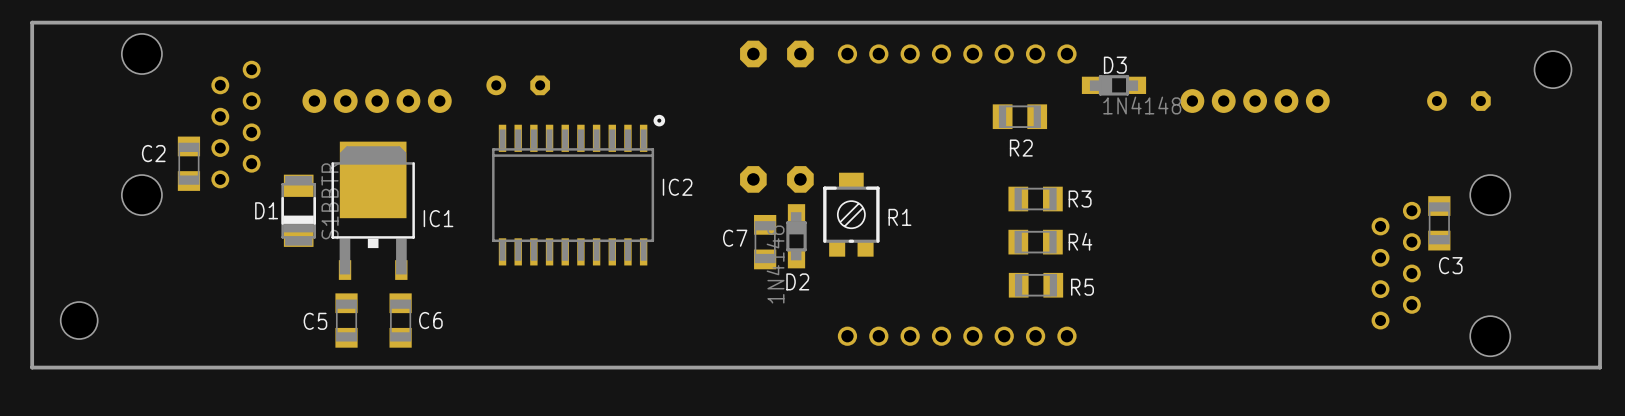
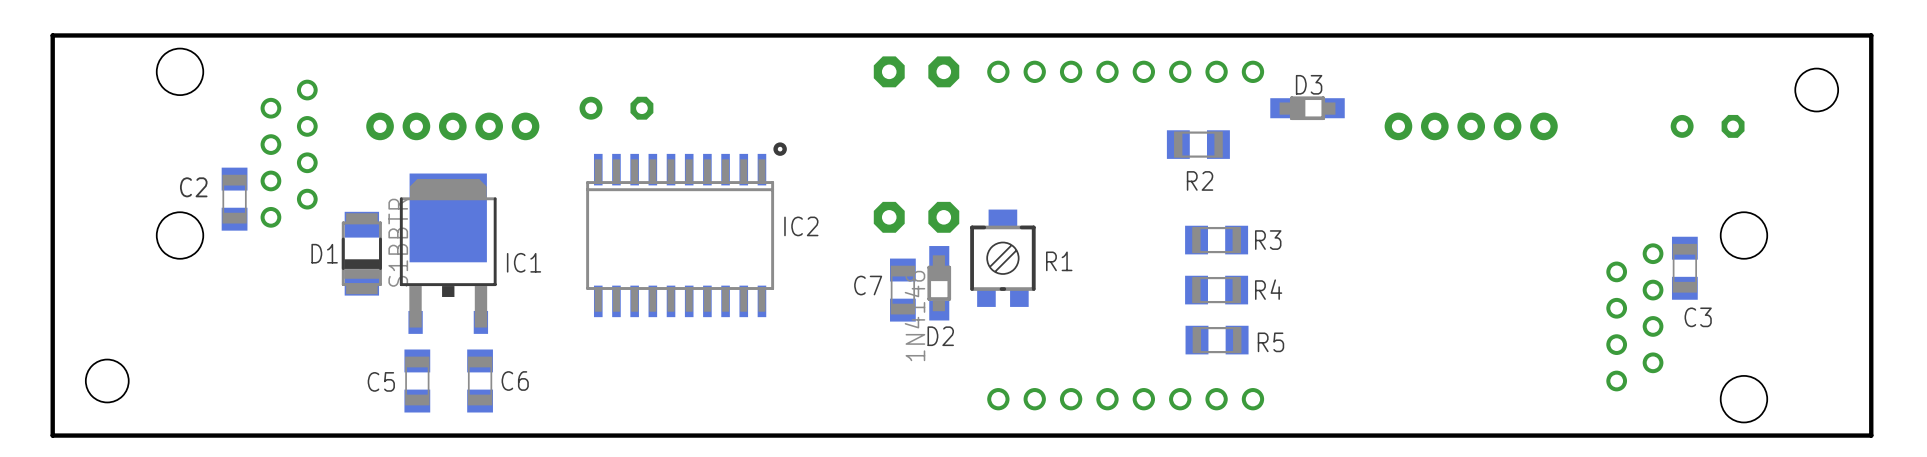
D3 value: 1N4148 (1142, 105) -> none

